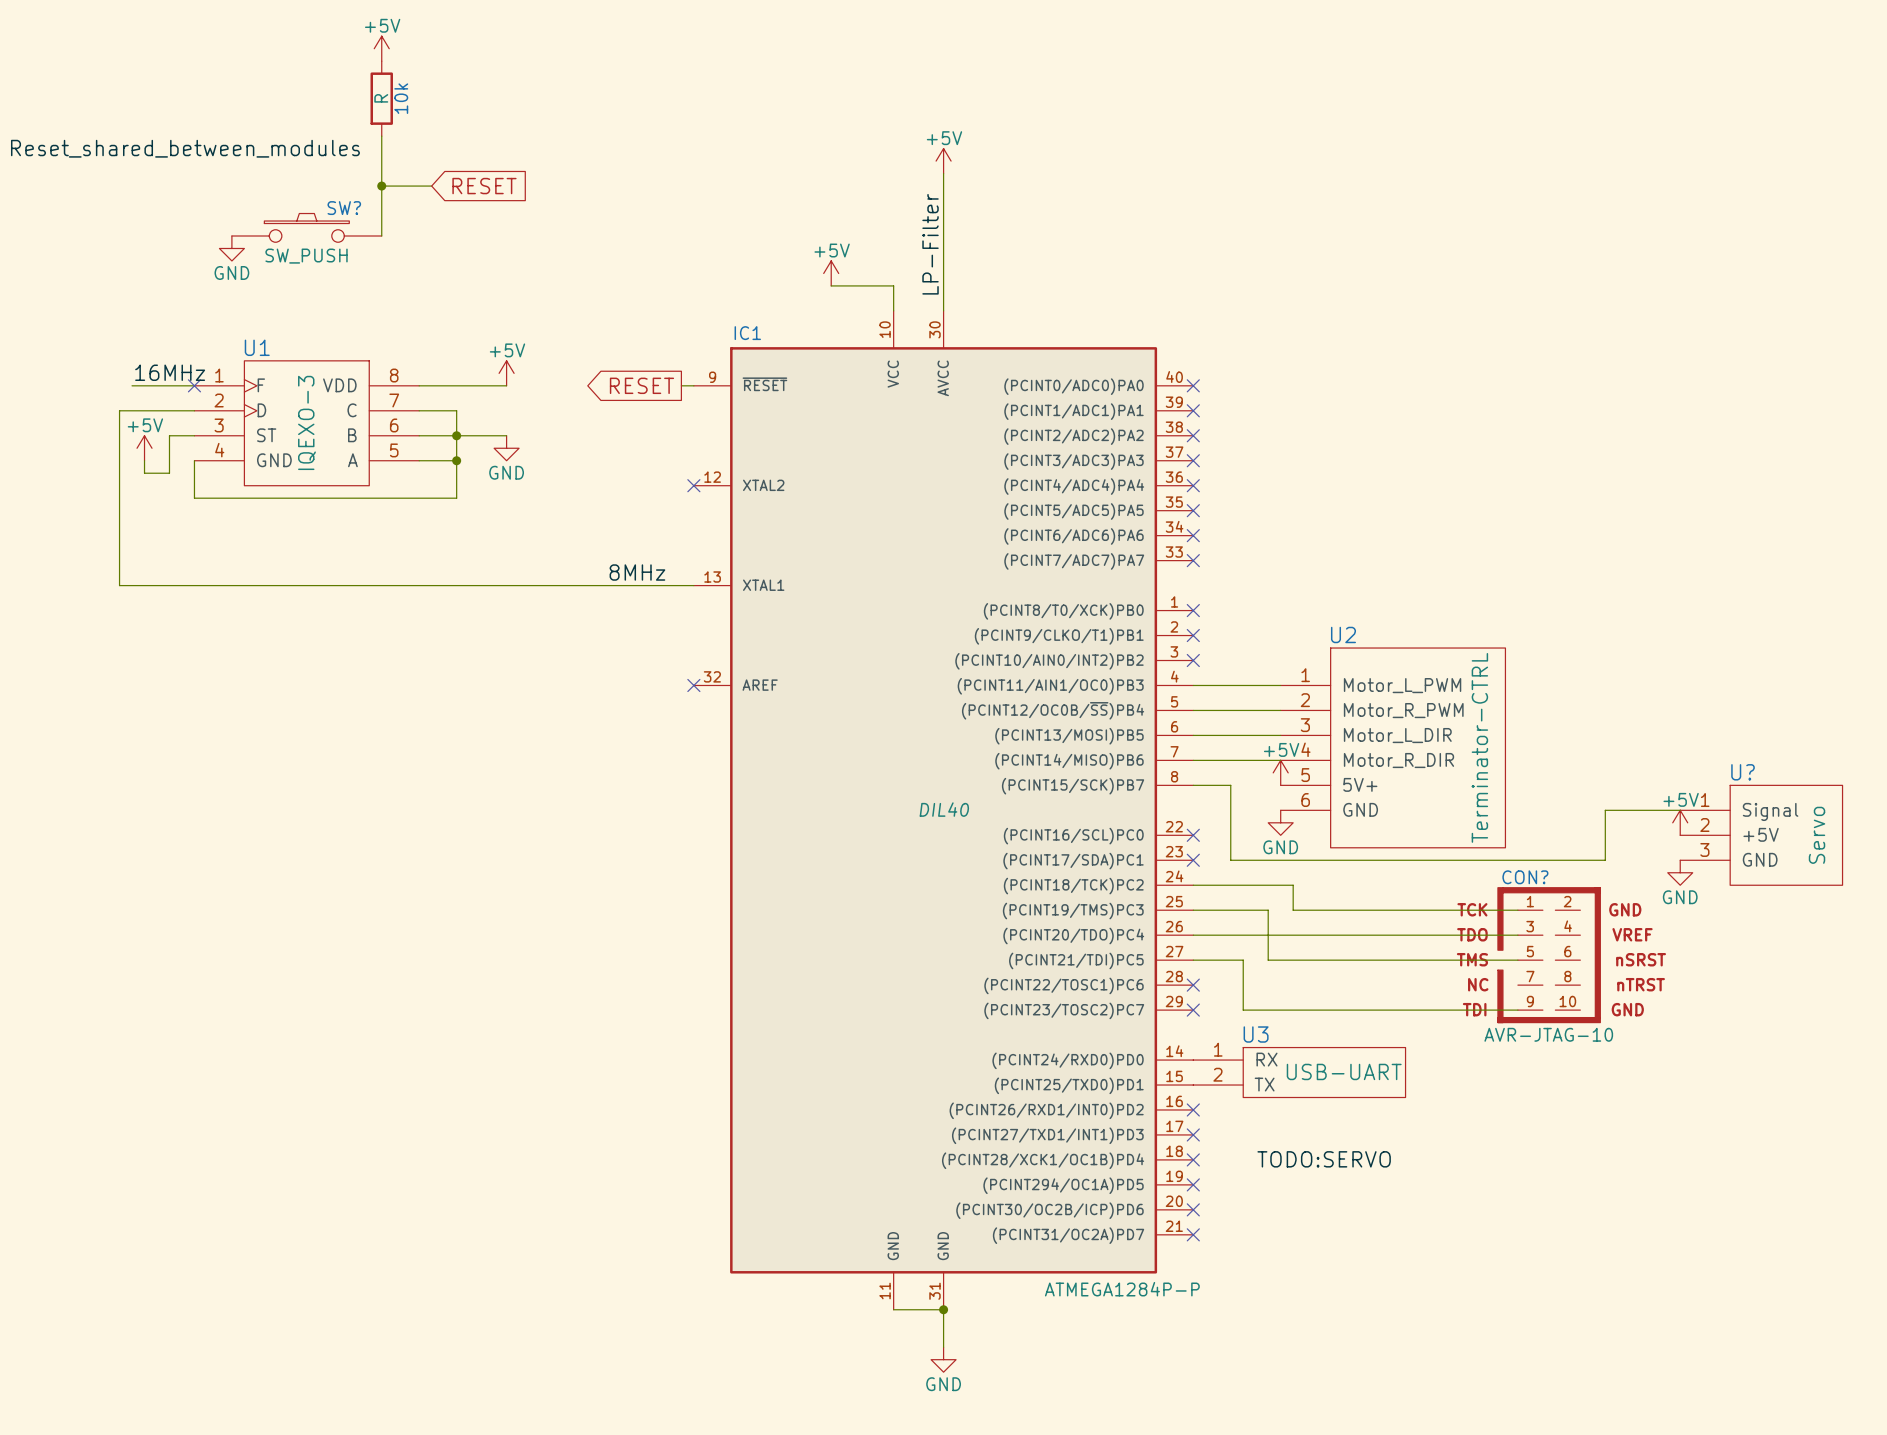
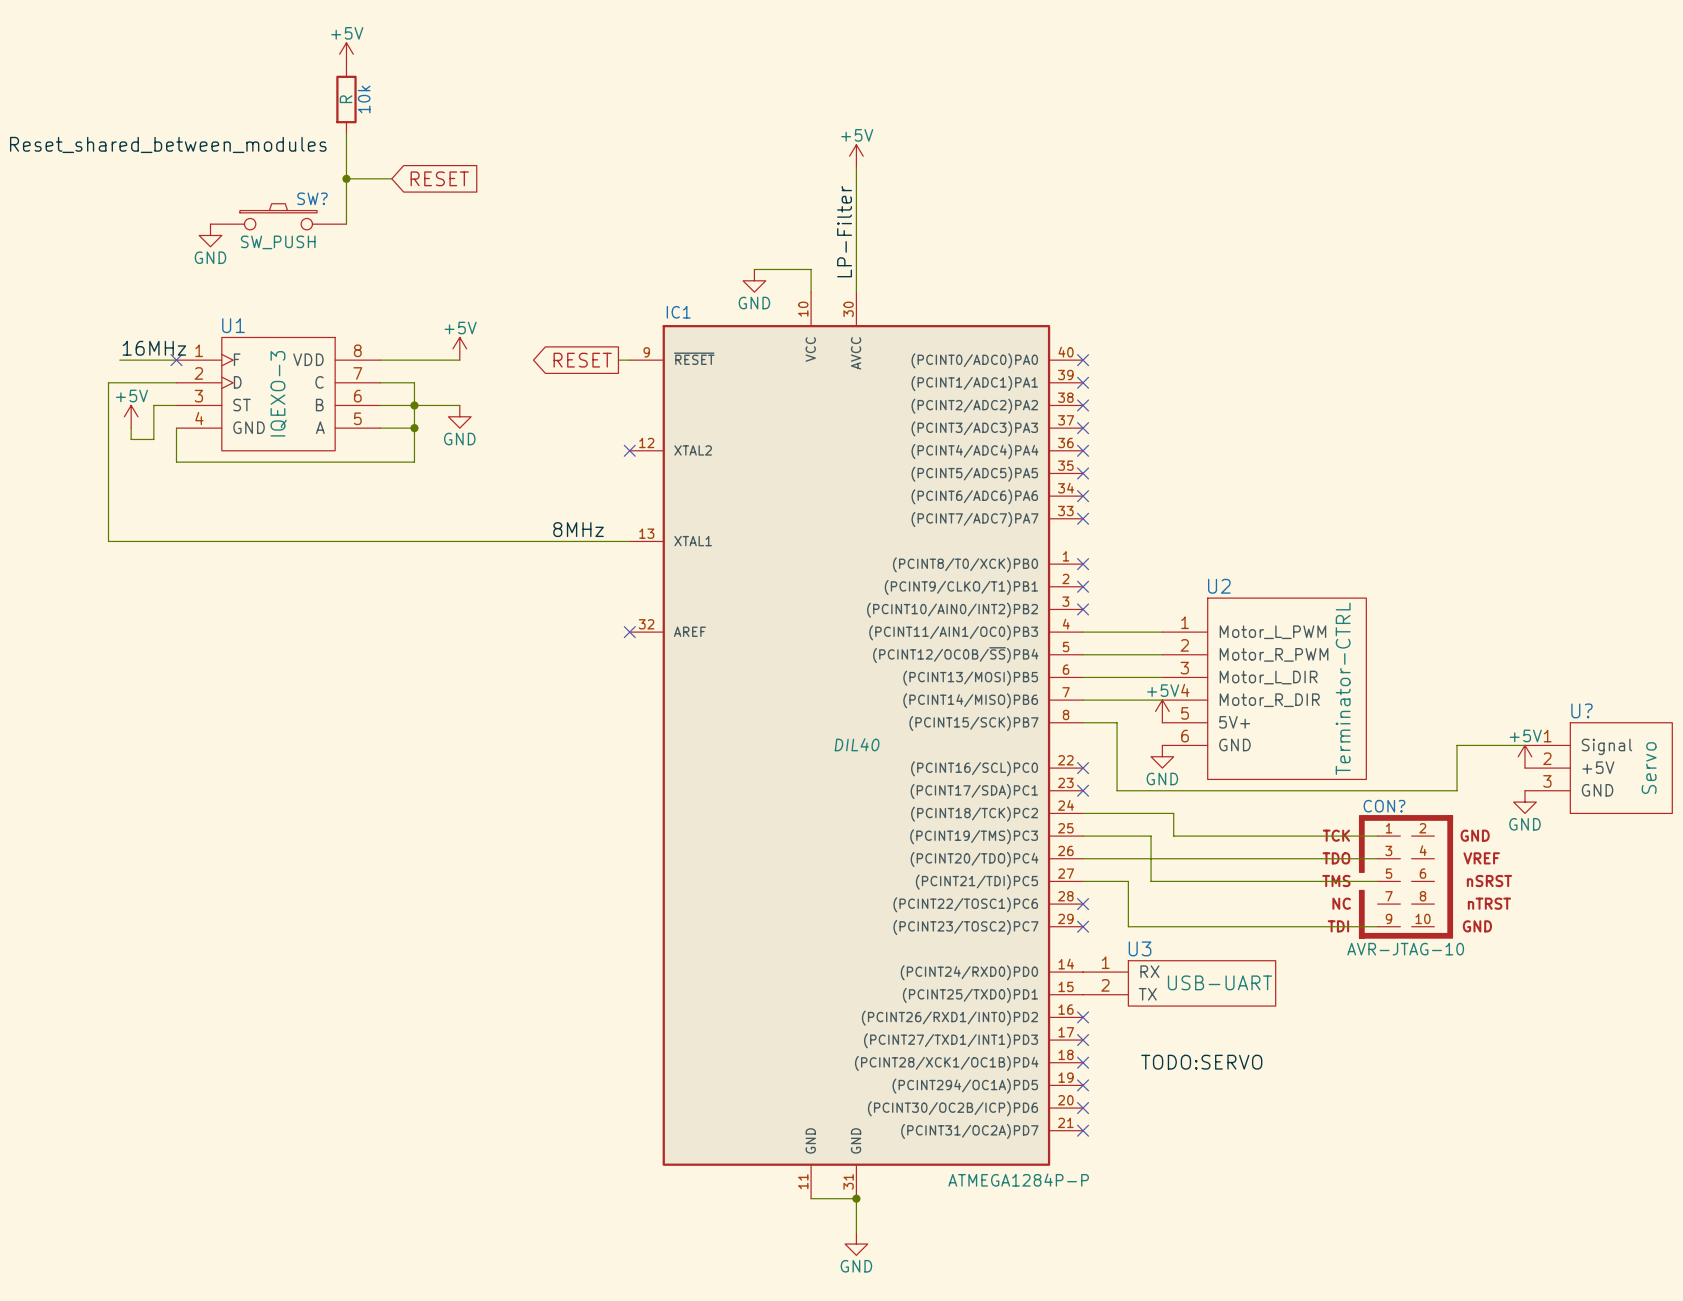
power symbol: +5V (831, 273) -> none
power symbol: none -> GND (754, 280)

